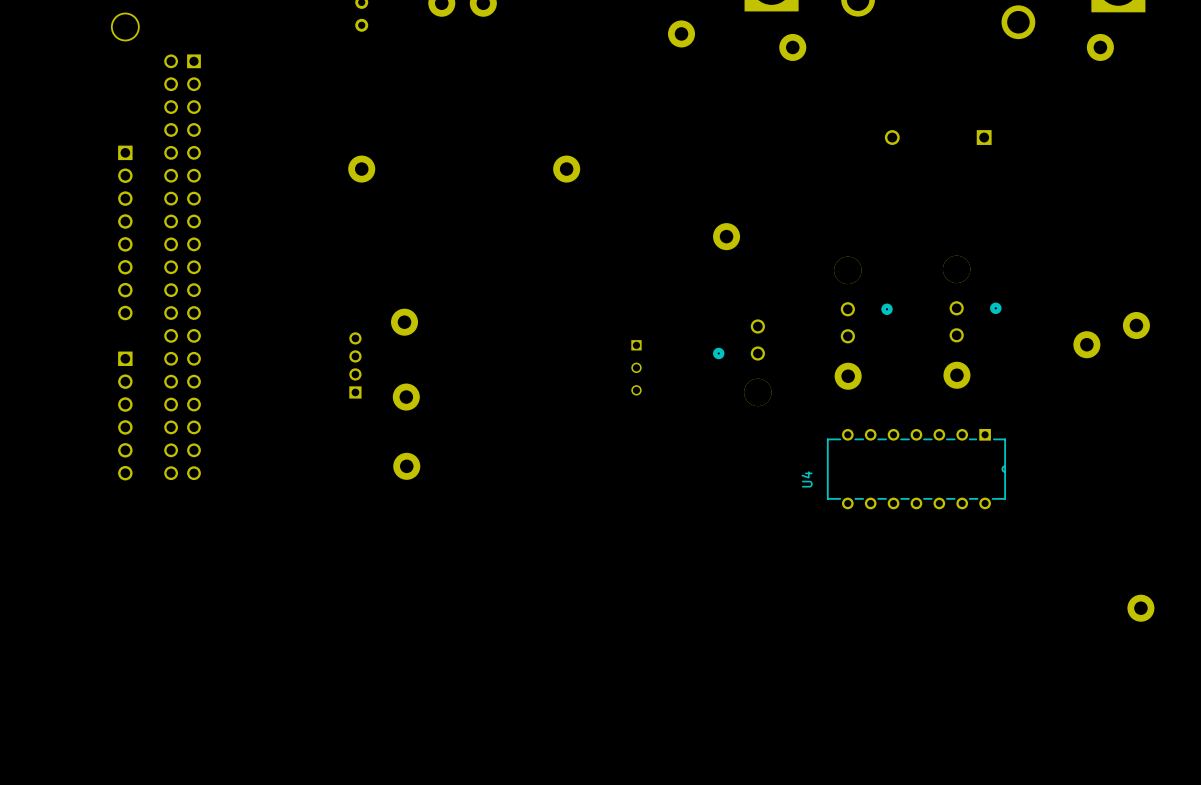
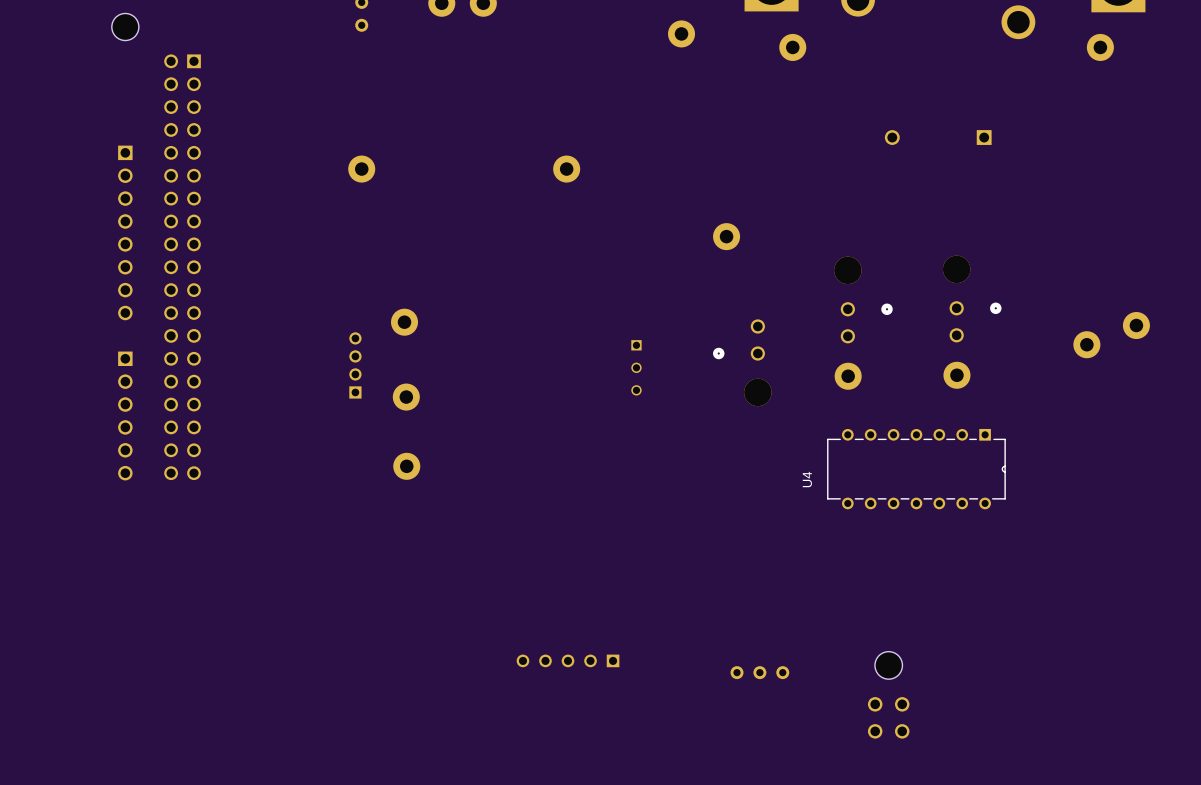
part: (1140, 608) -> none
part: none -> (568, 660)
part: none -> (759, 672)
part: none -> (888, 695)

